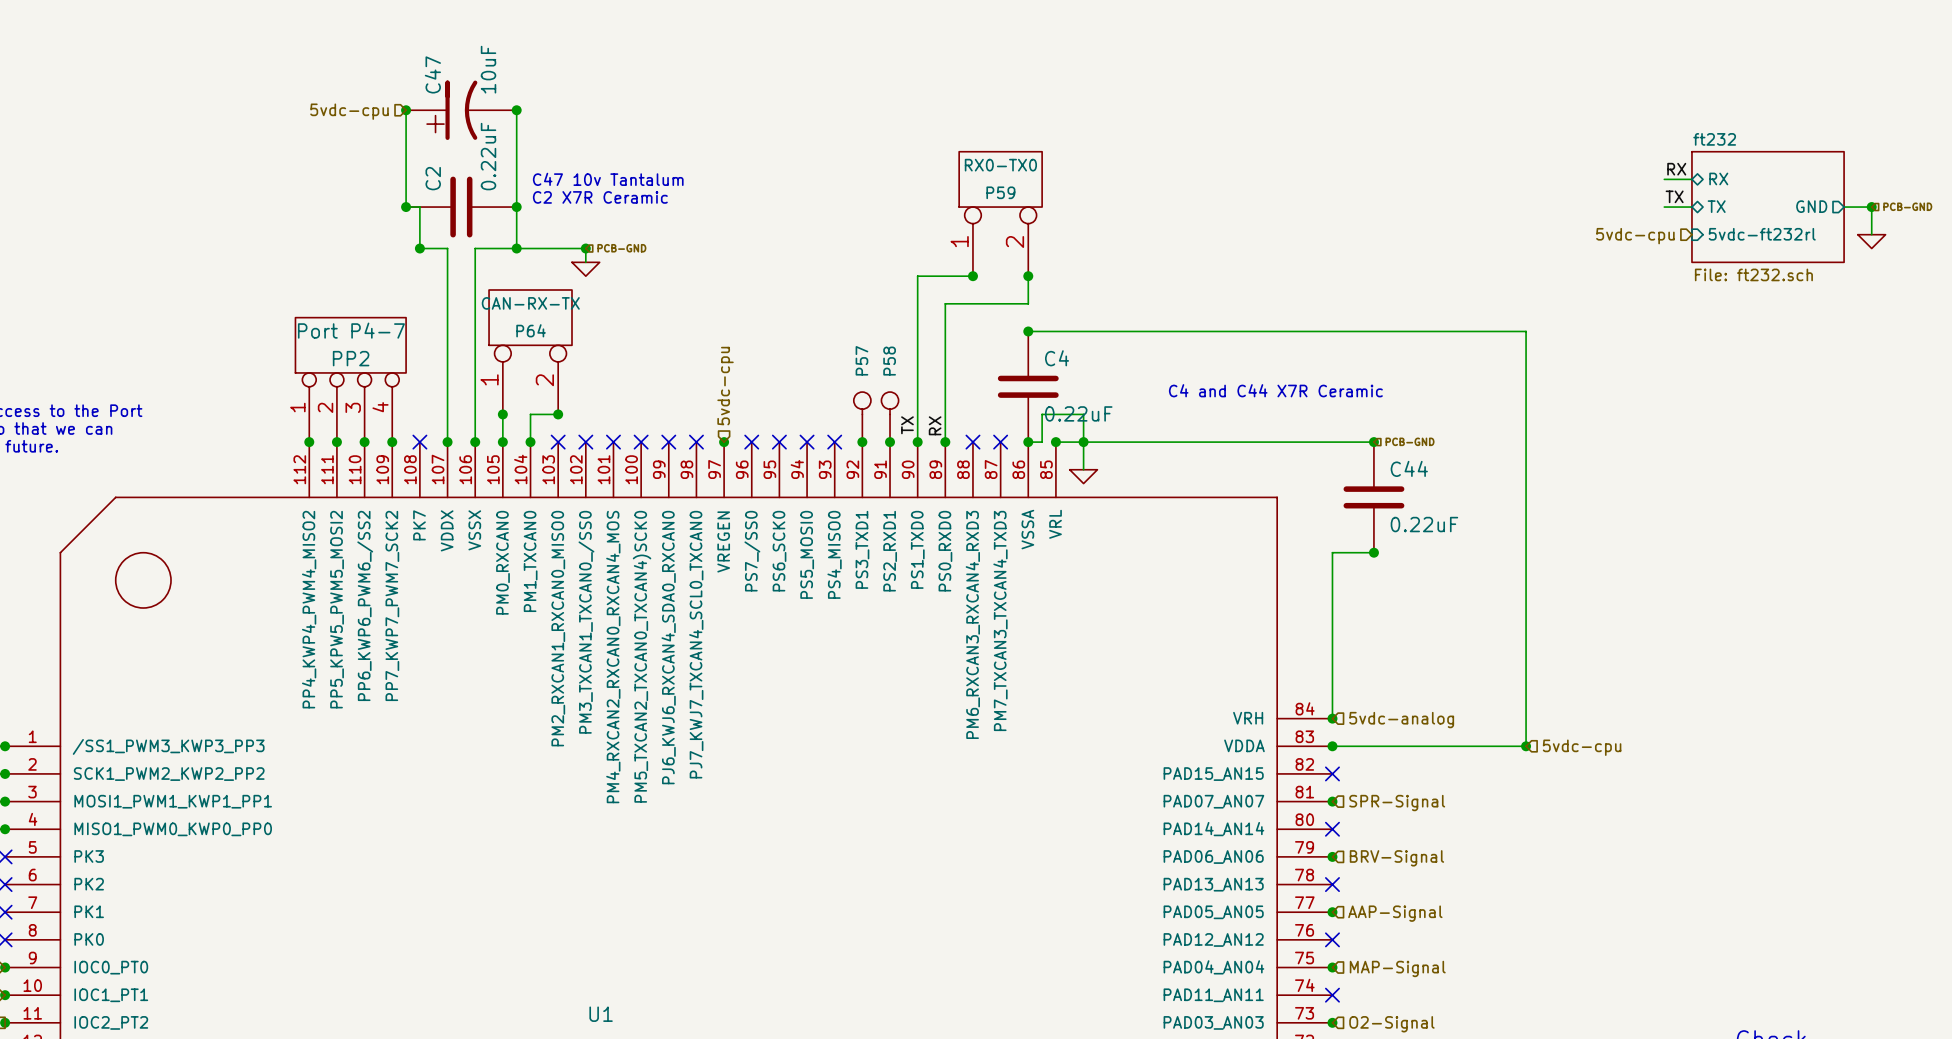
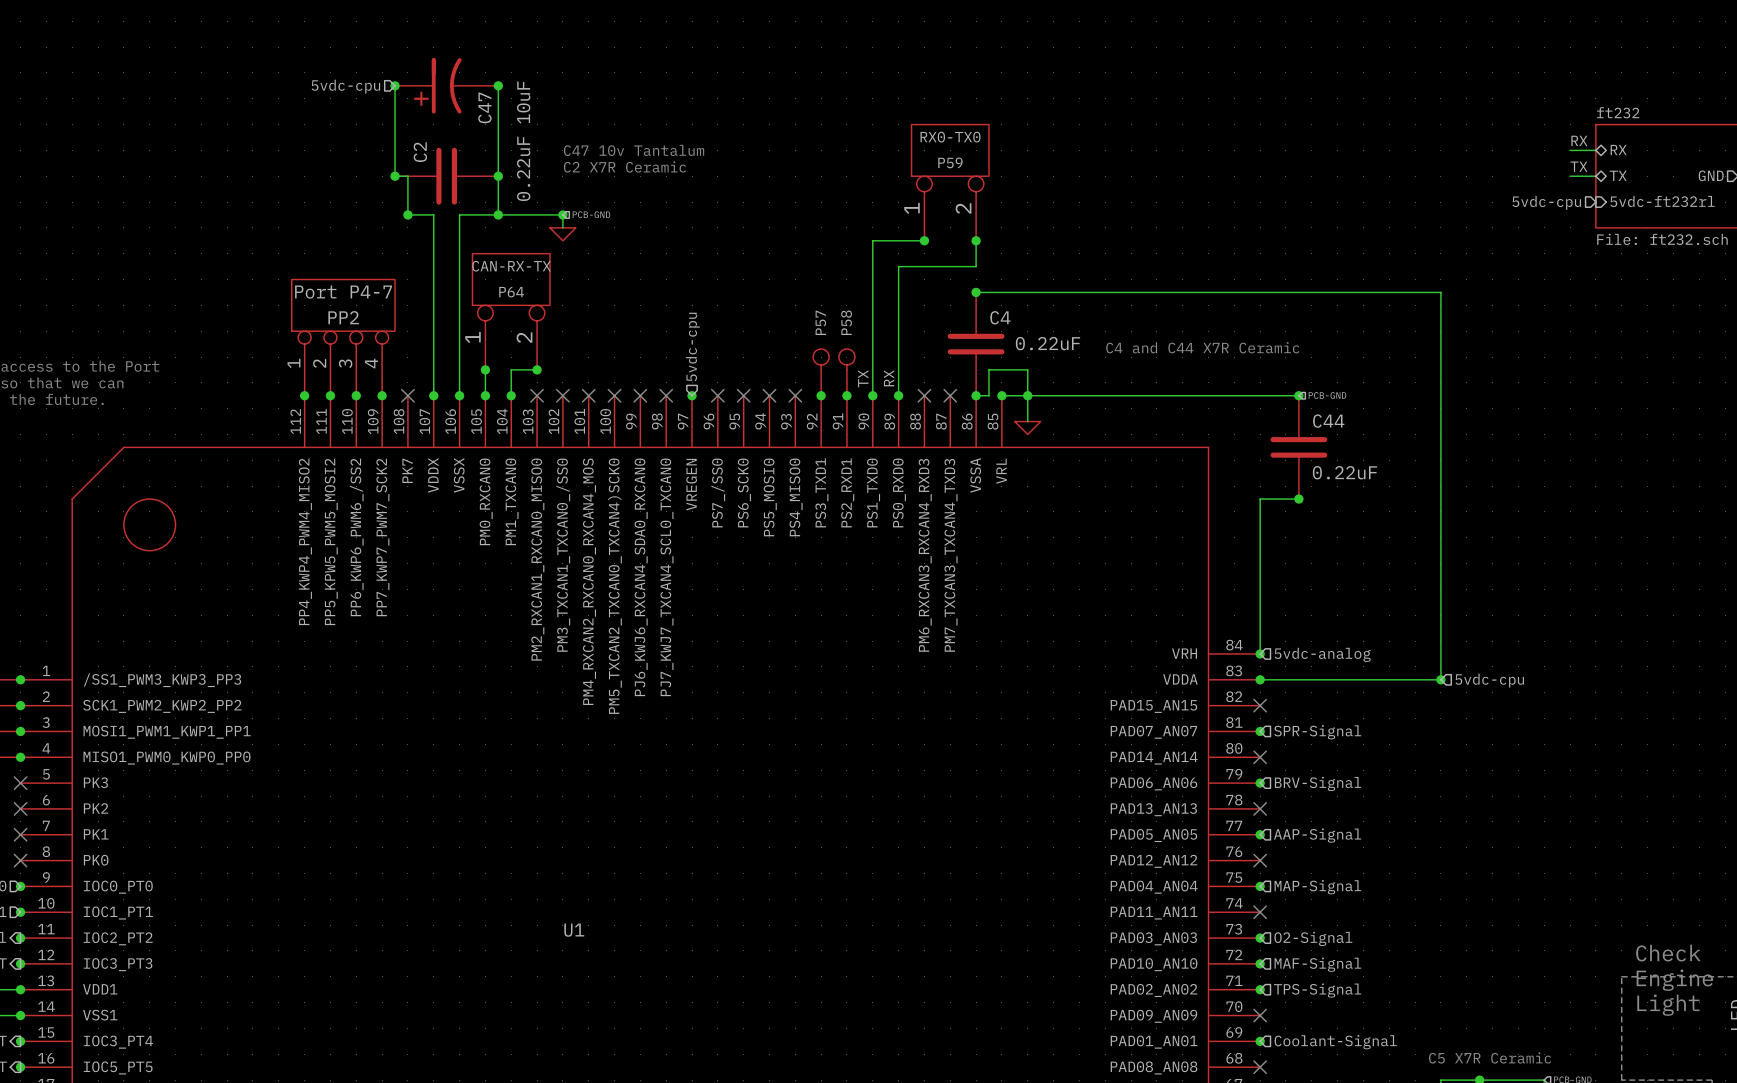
C47 value position: 10uF (488, 69) -> 10uF (523, 102)
C47 name position: C47 (432, 74) -> C47 (484, 107)
C2 value position: 0.22uF (488, 156) -> 0.22uF (523, 168)
text position: C47 10v Tantalum (608, 179) -> C47 10v Tantalum (634, 150)
text position: C2 X7R Ceramic (600, 197) -> C2 X7R Ceramic (624, 166)
C4 value position: 0.22uF (1078, 413) -> 0.22uF (1047, 343)

